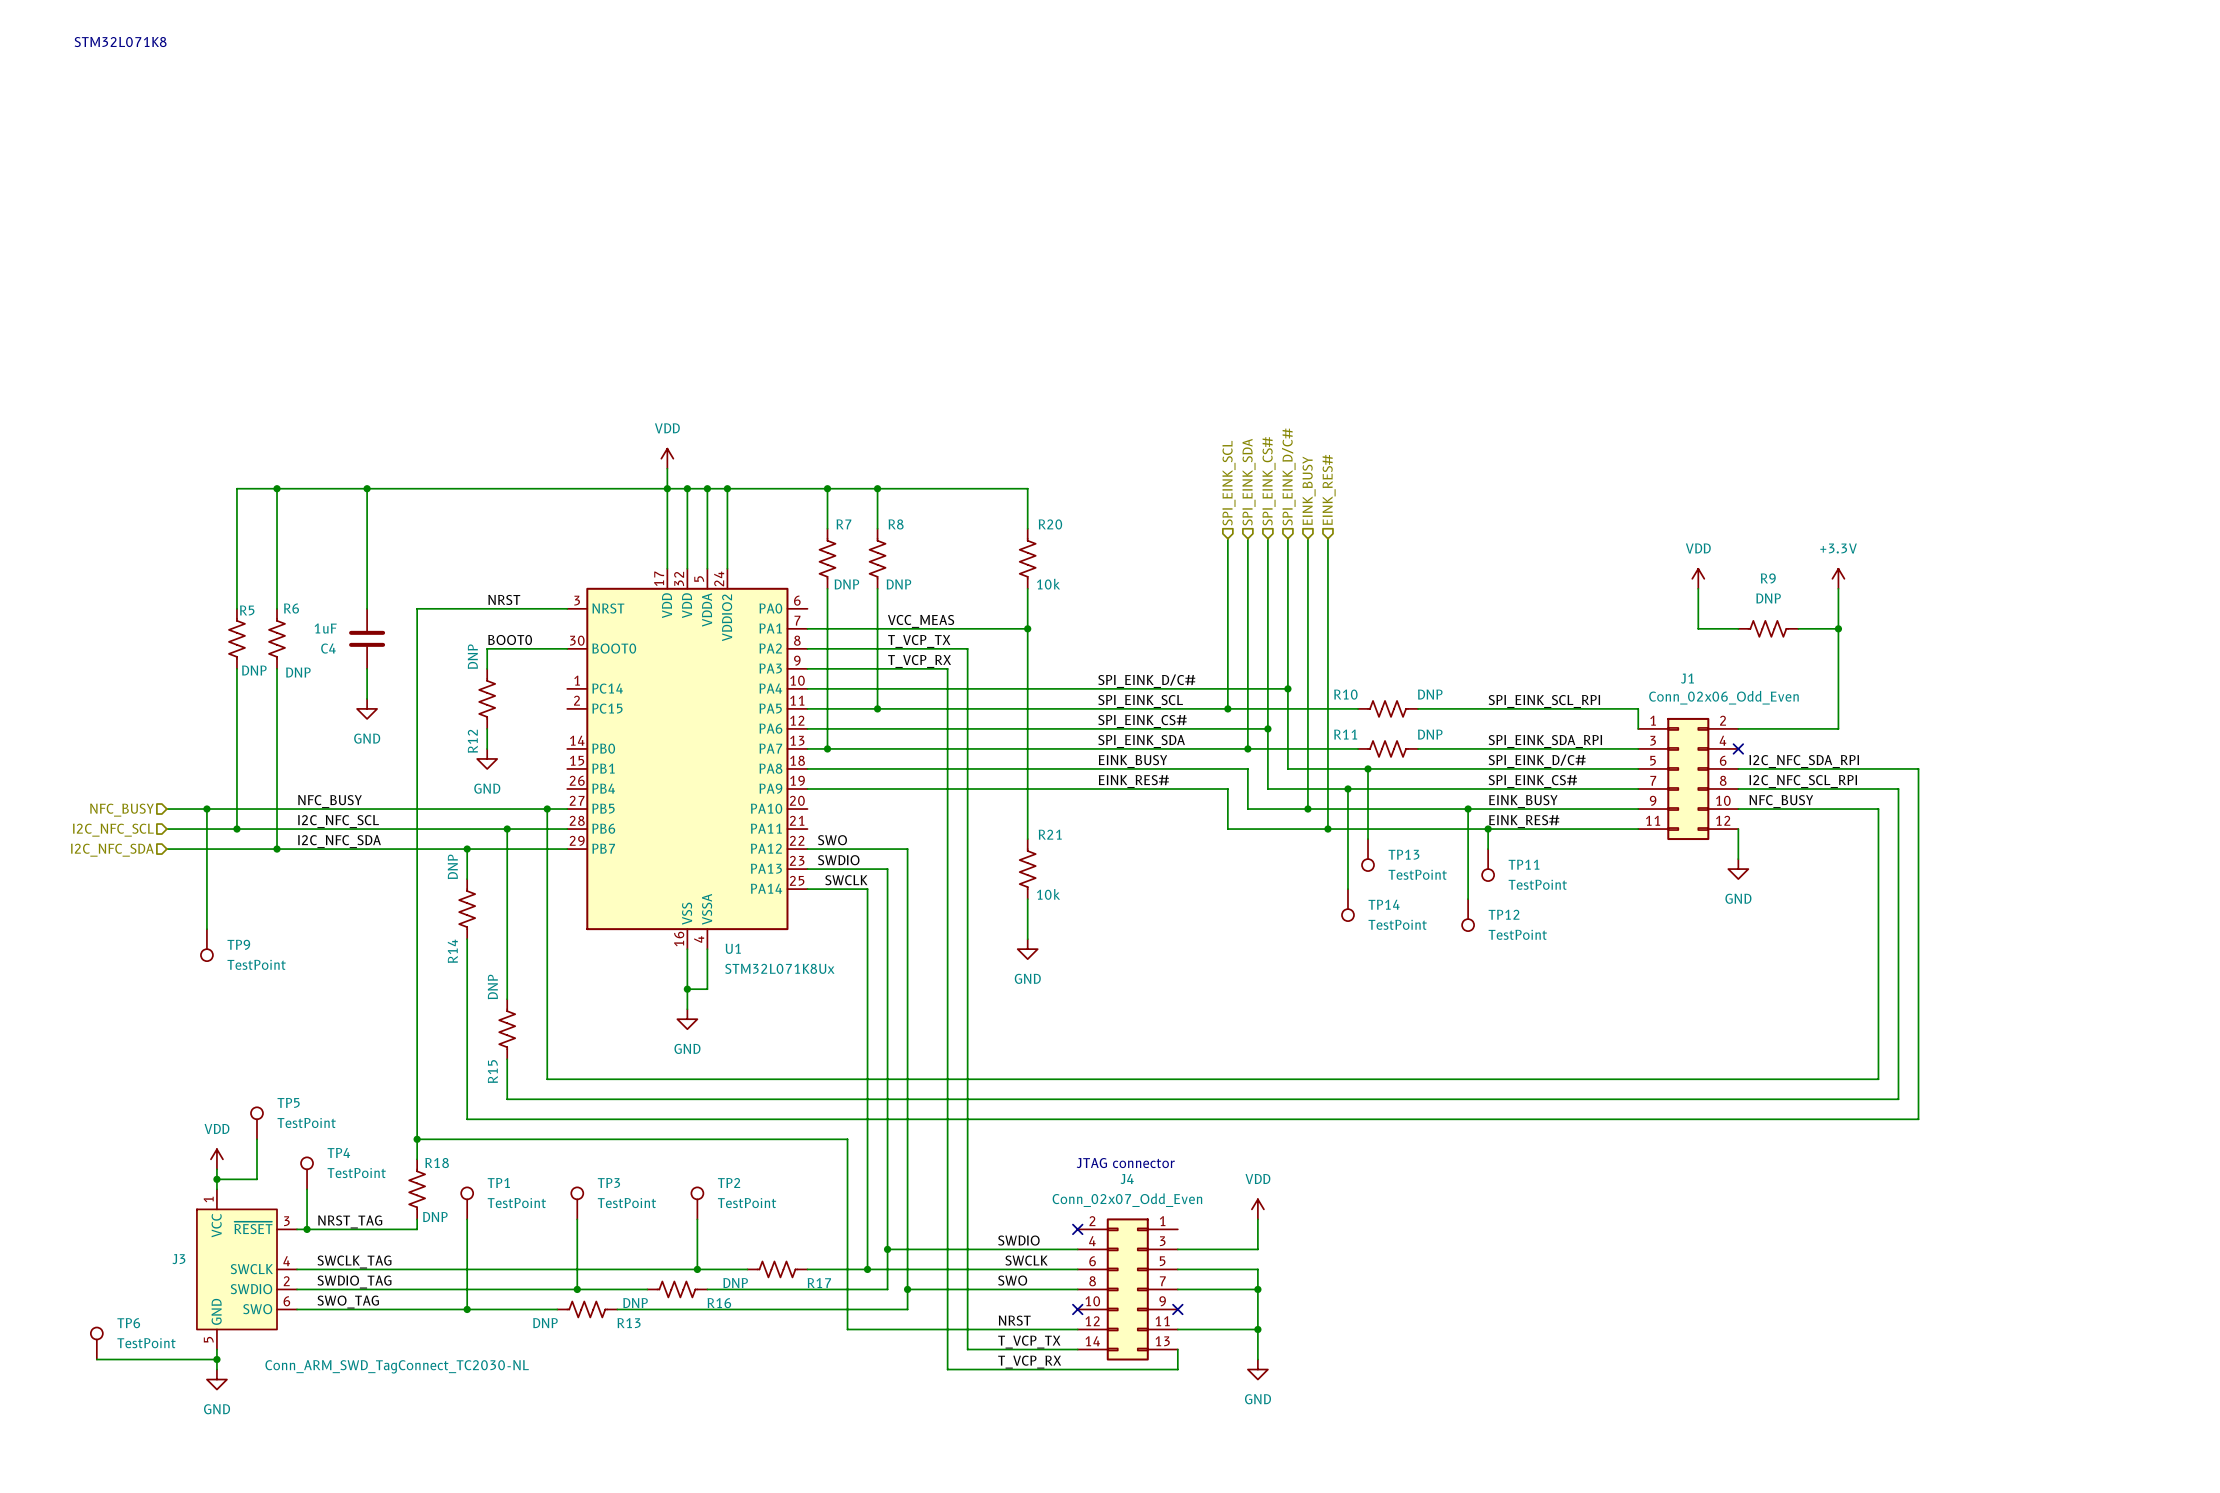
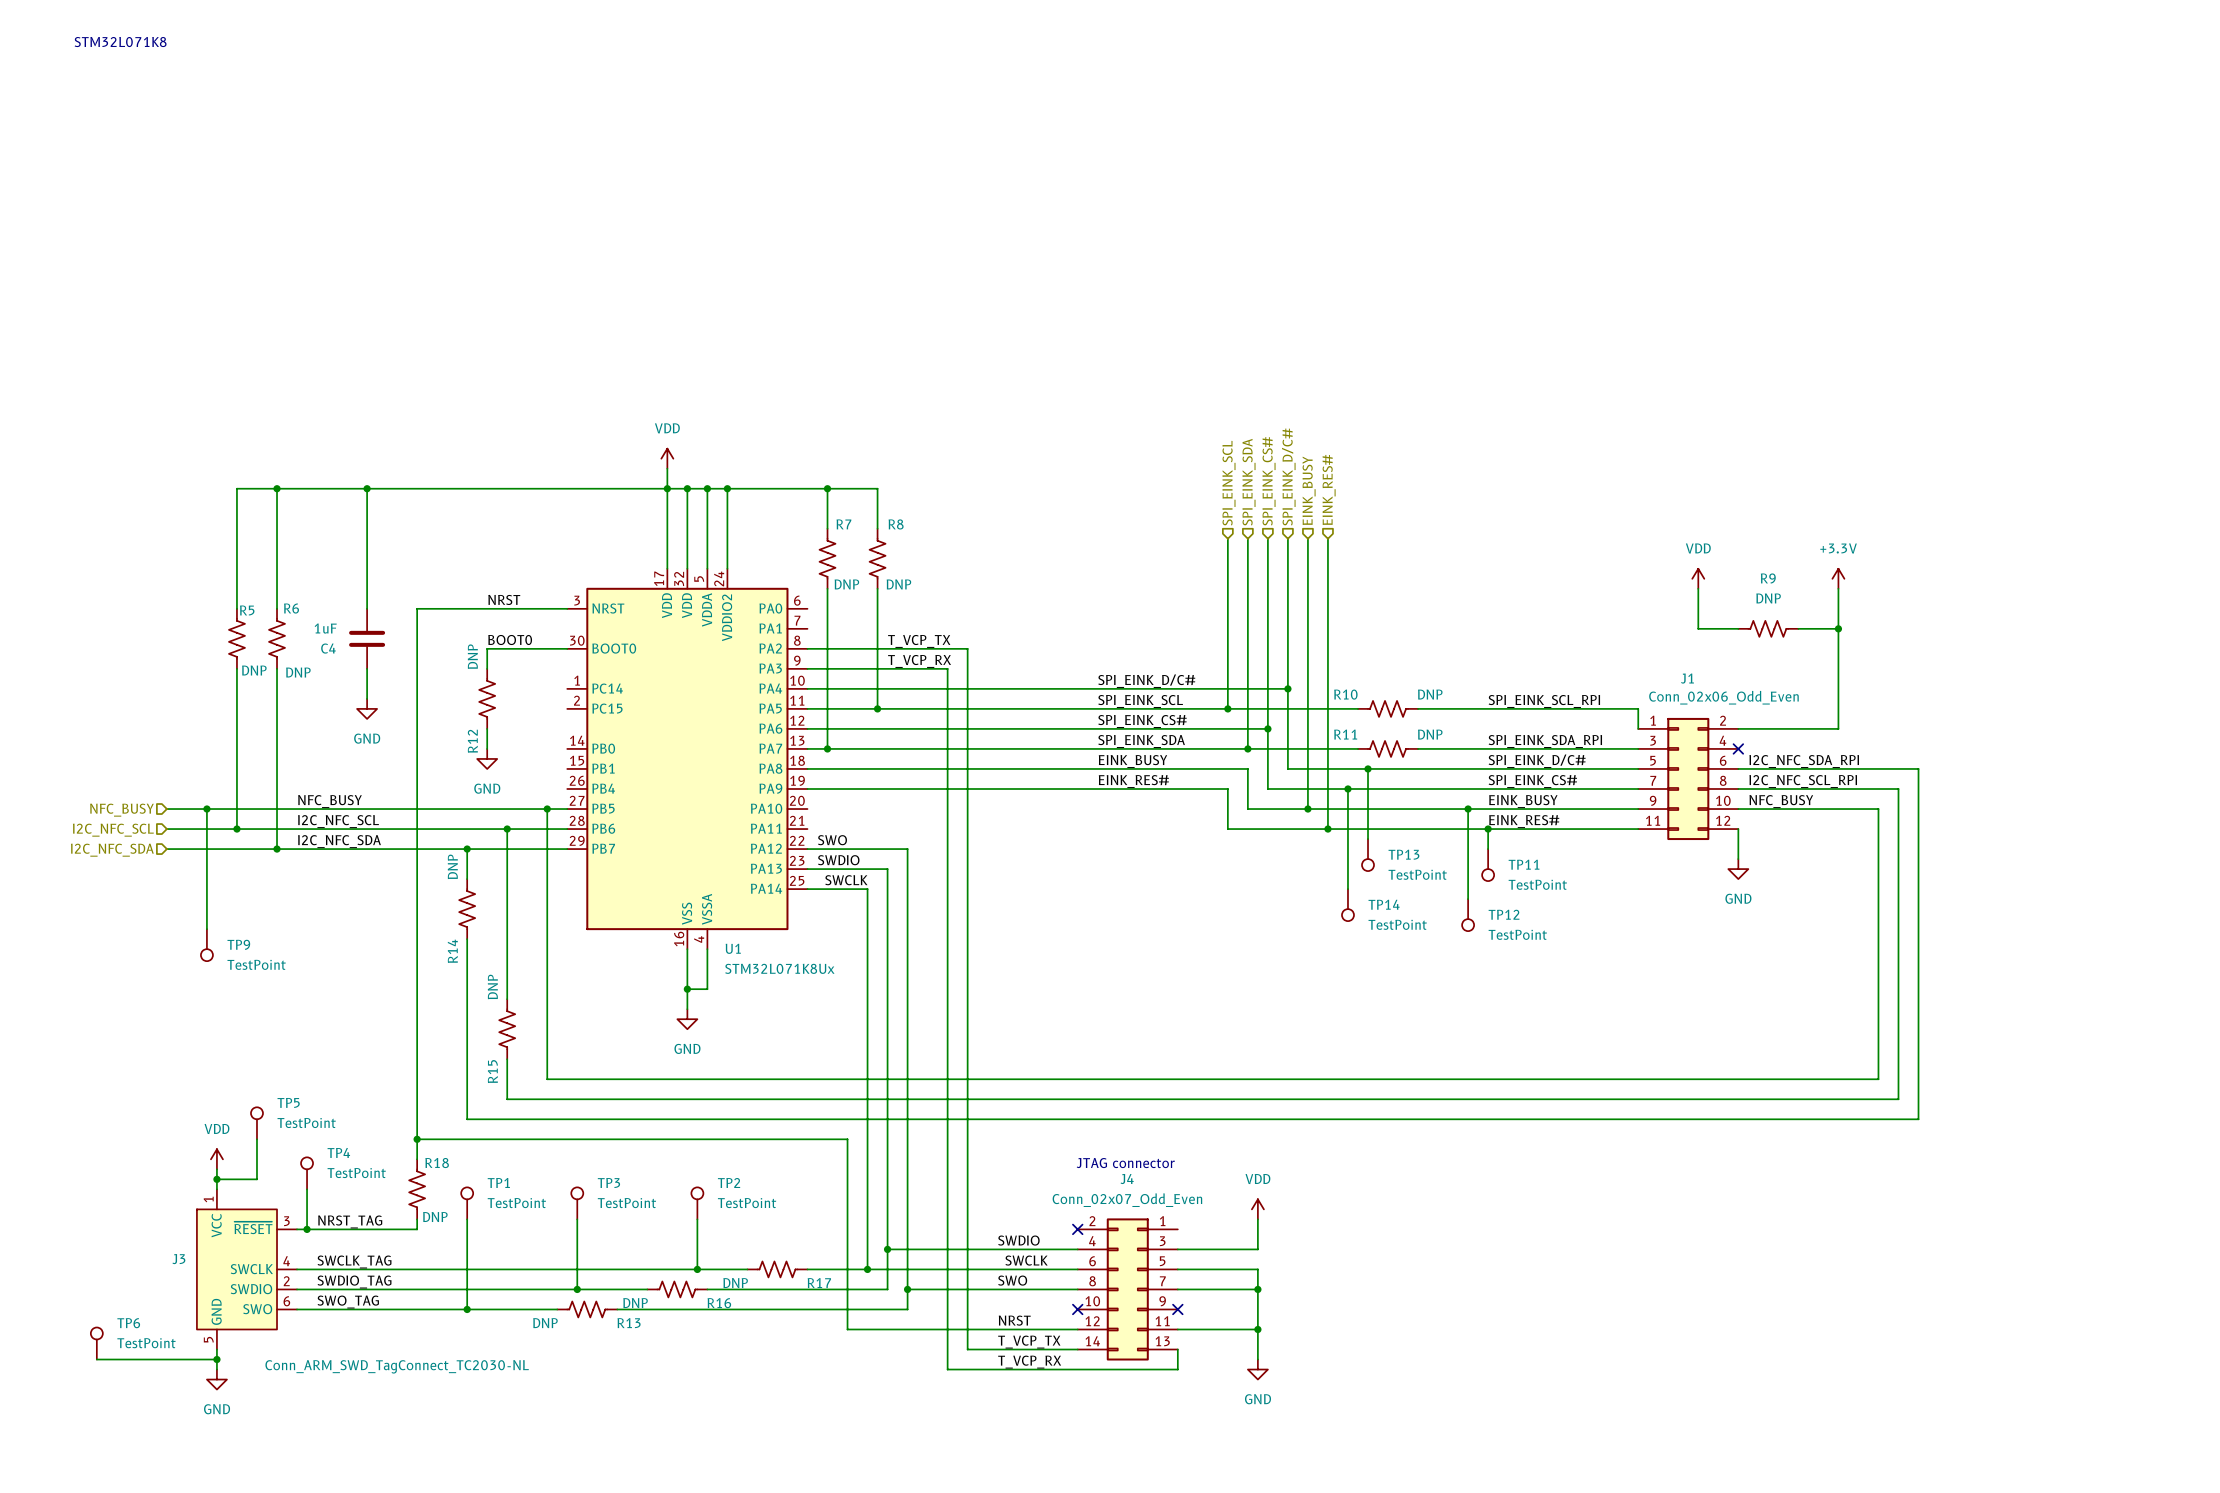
wire: (877, 488) (1027, 488) (1027, 528) -> none
junction: (877, 488) -> none
R20: 10k (1027, 558) -> none
wire: (1027, 588) (1027, 839) -> none
label: VCC_MEAS (921, 621) -> none
wire: (807, 628) (1027, 628) -> none
junction: (1027, 628) -> none
R21: 10k (1027, 869) -> none
wire: (1027, 899) (1027, 939) -> none
power symbol: GND (1027, 949) -> none

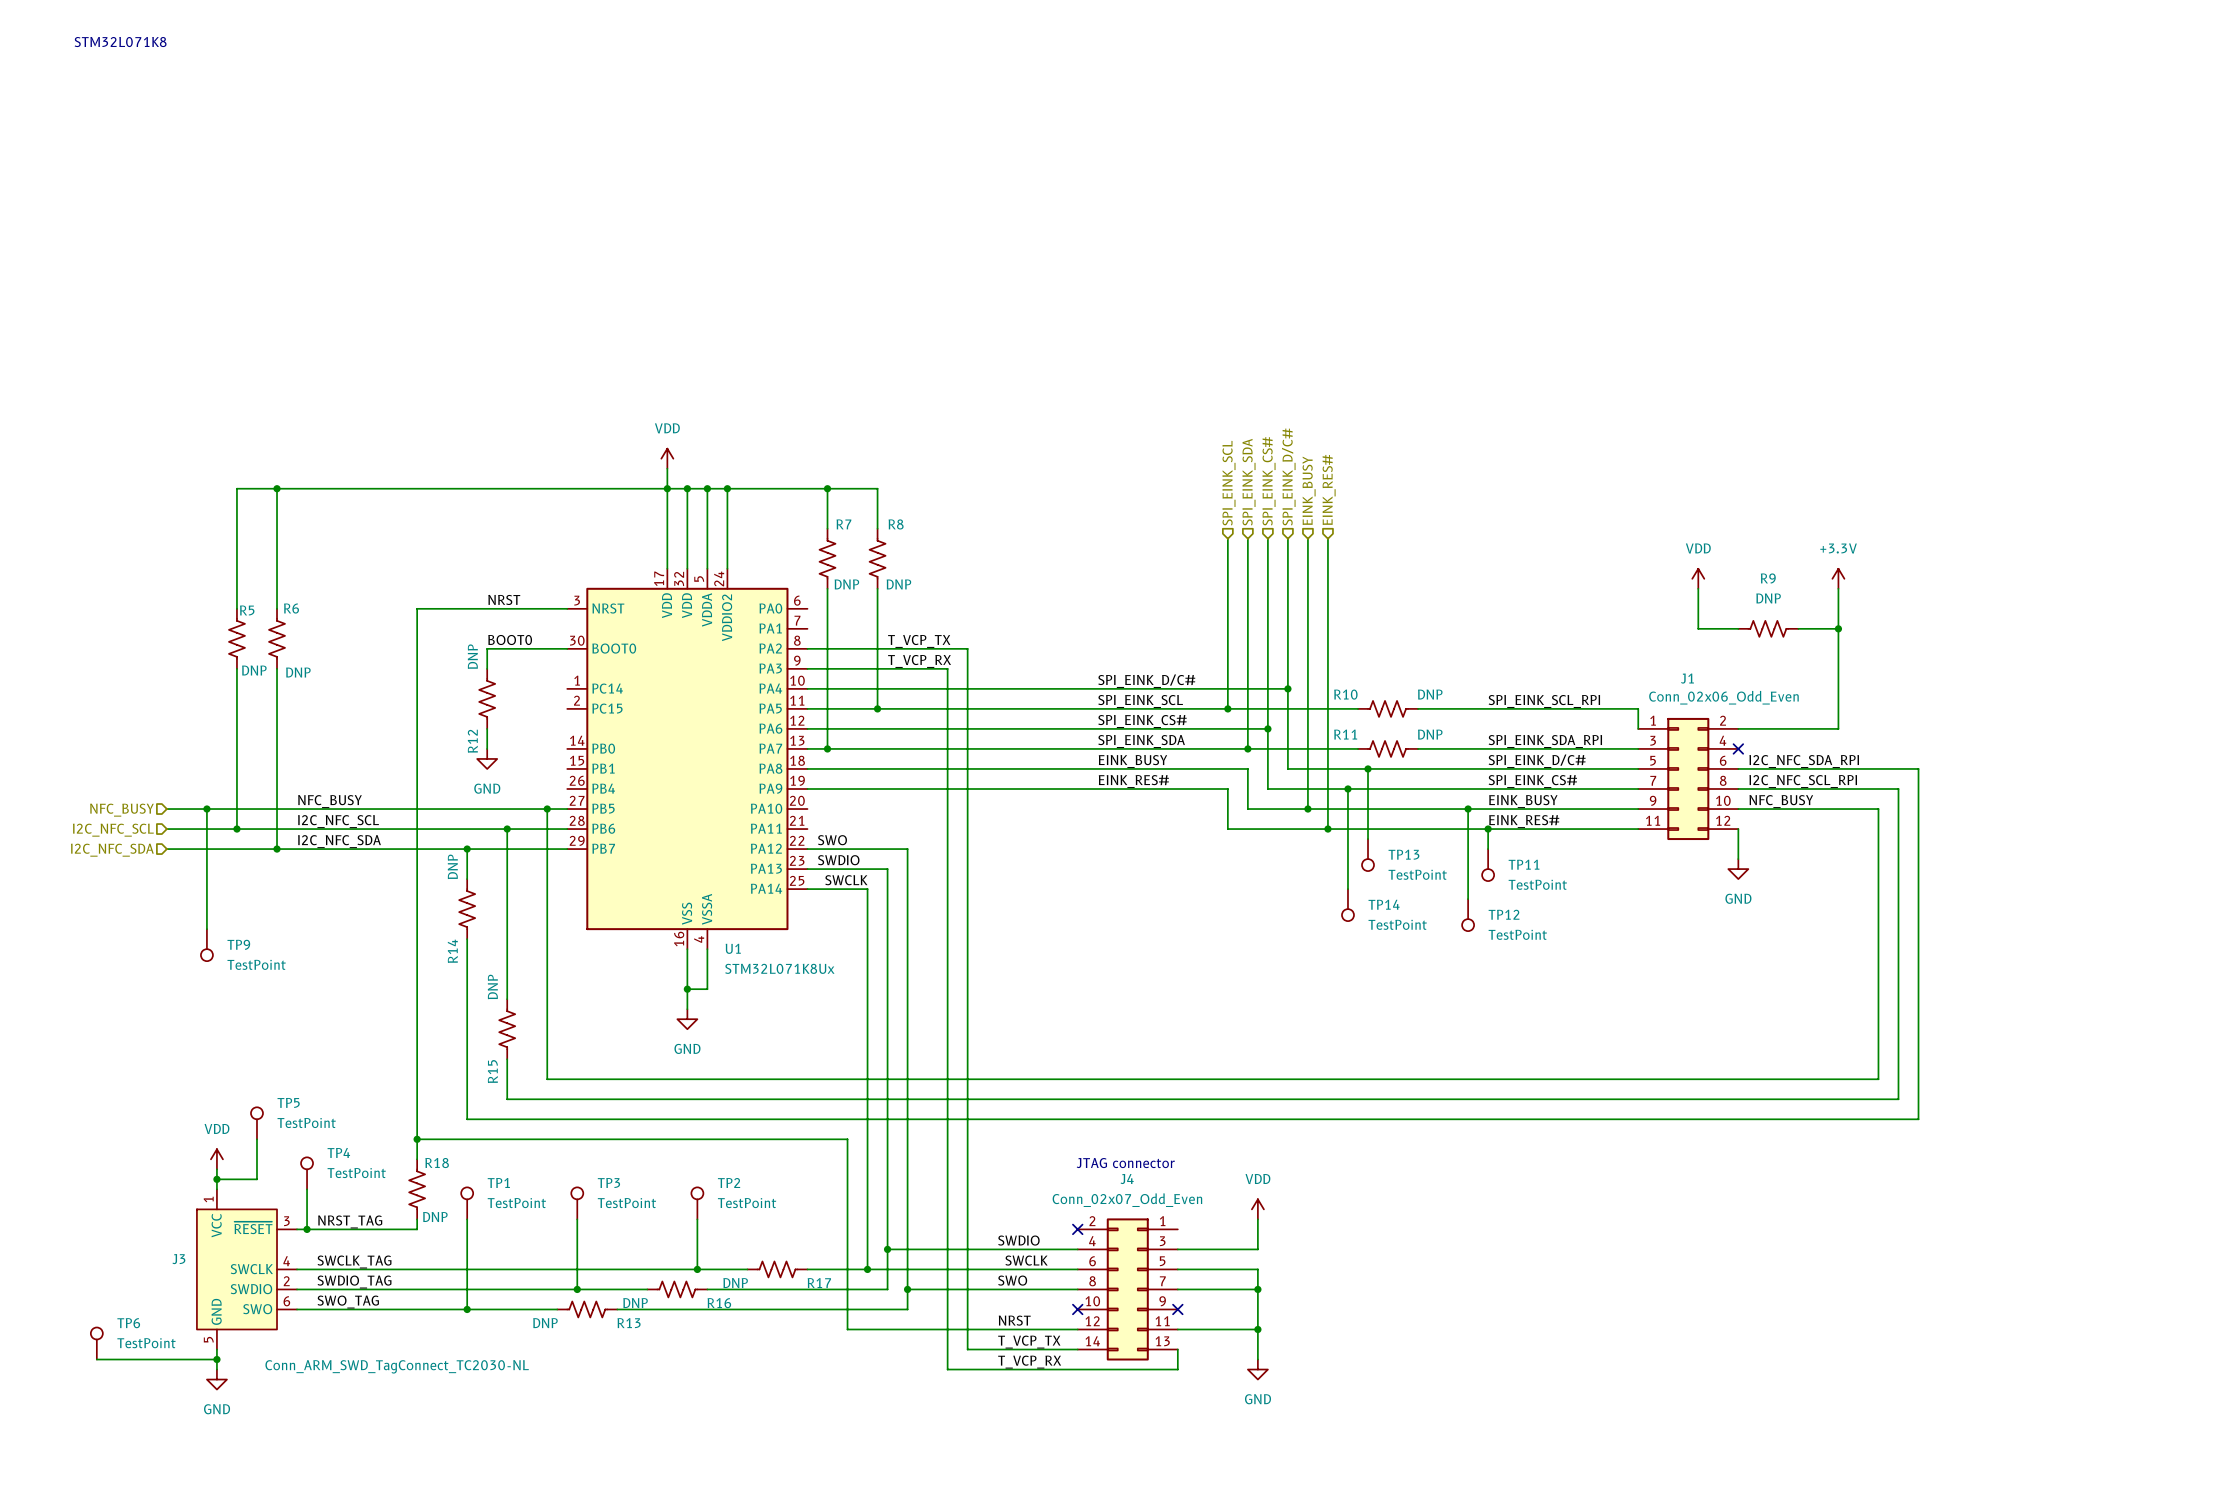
wire: (367, 488) (367, 608) -> none
junction: (367, 488) -> none
C4: 1uF (367, 638) -> none
wire: (367, 668) (367, 698) -> none
power symbol: GND (367, 708) -> none

